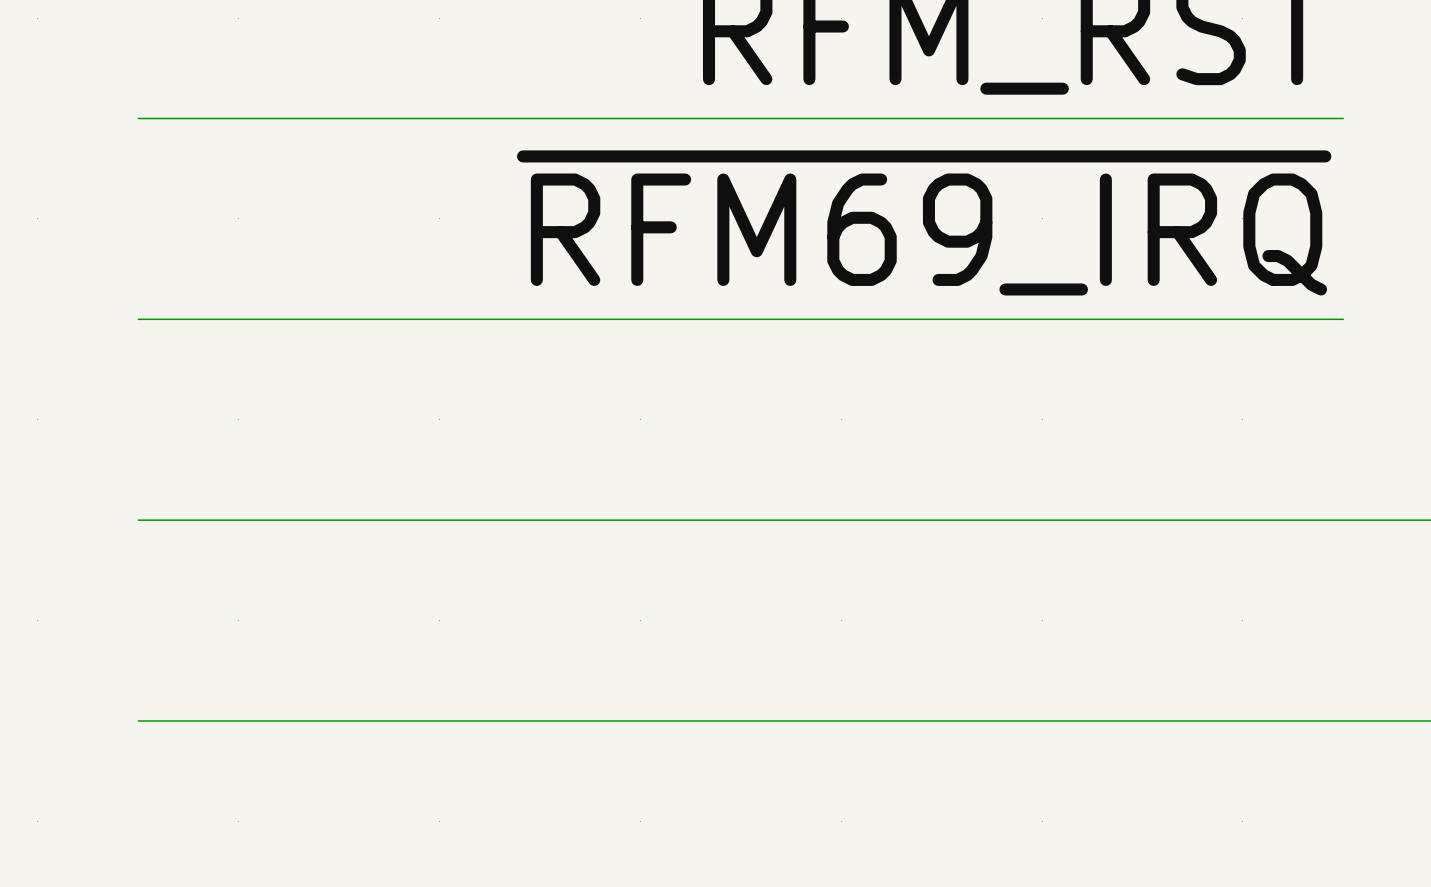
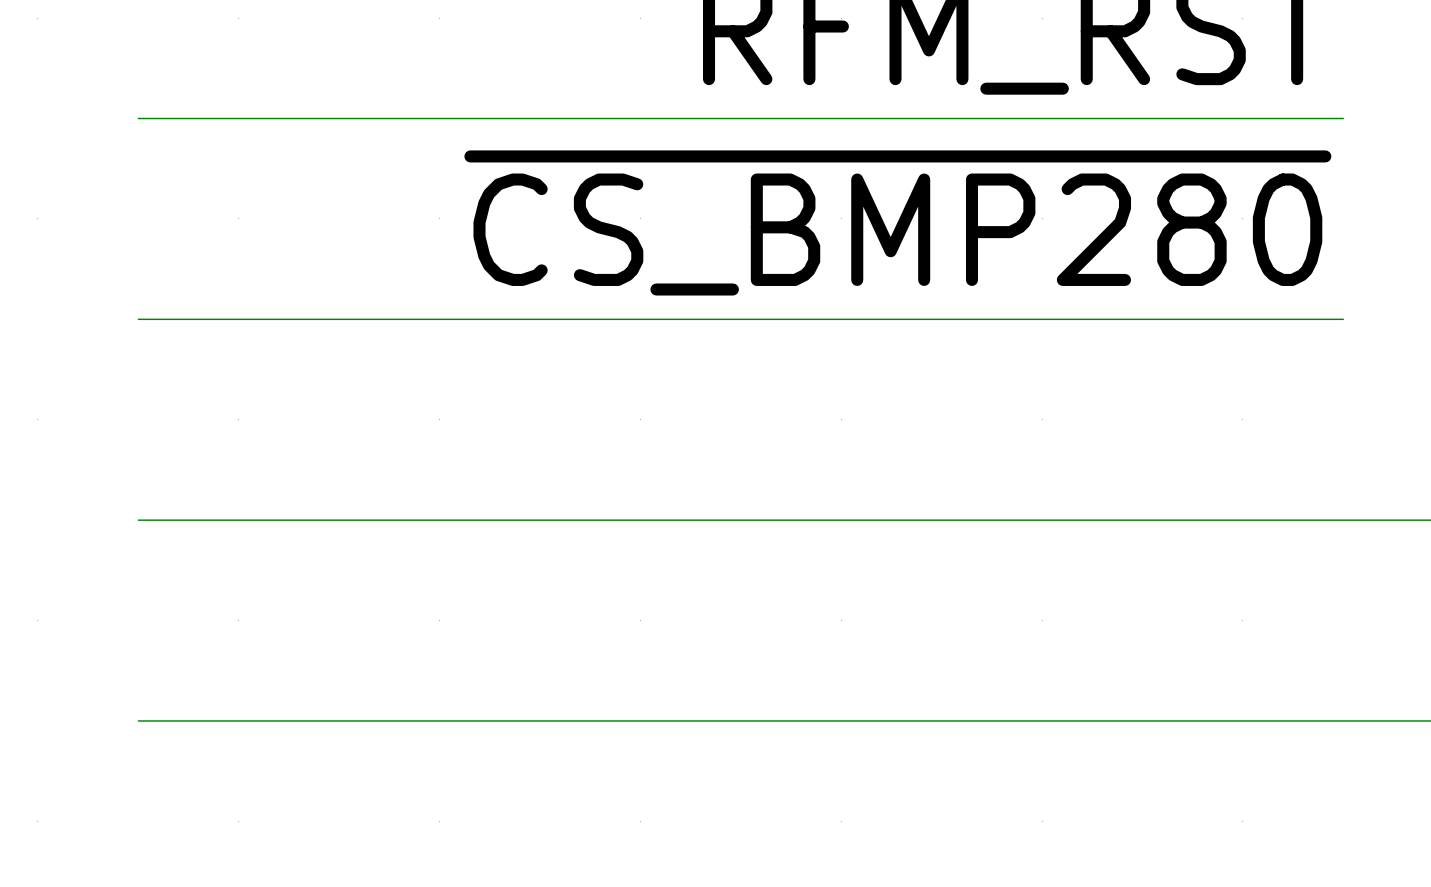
label: ~{RFM69_IRQ} (924, 222) -> ~{CS_BMP280} (897, 222)

